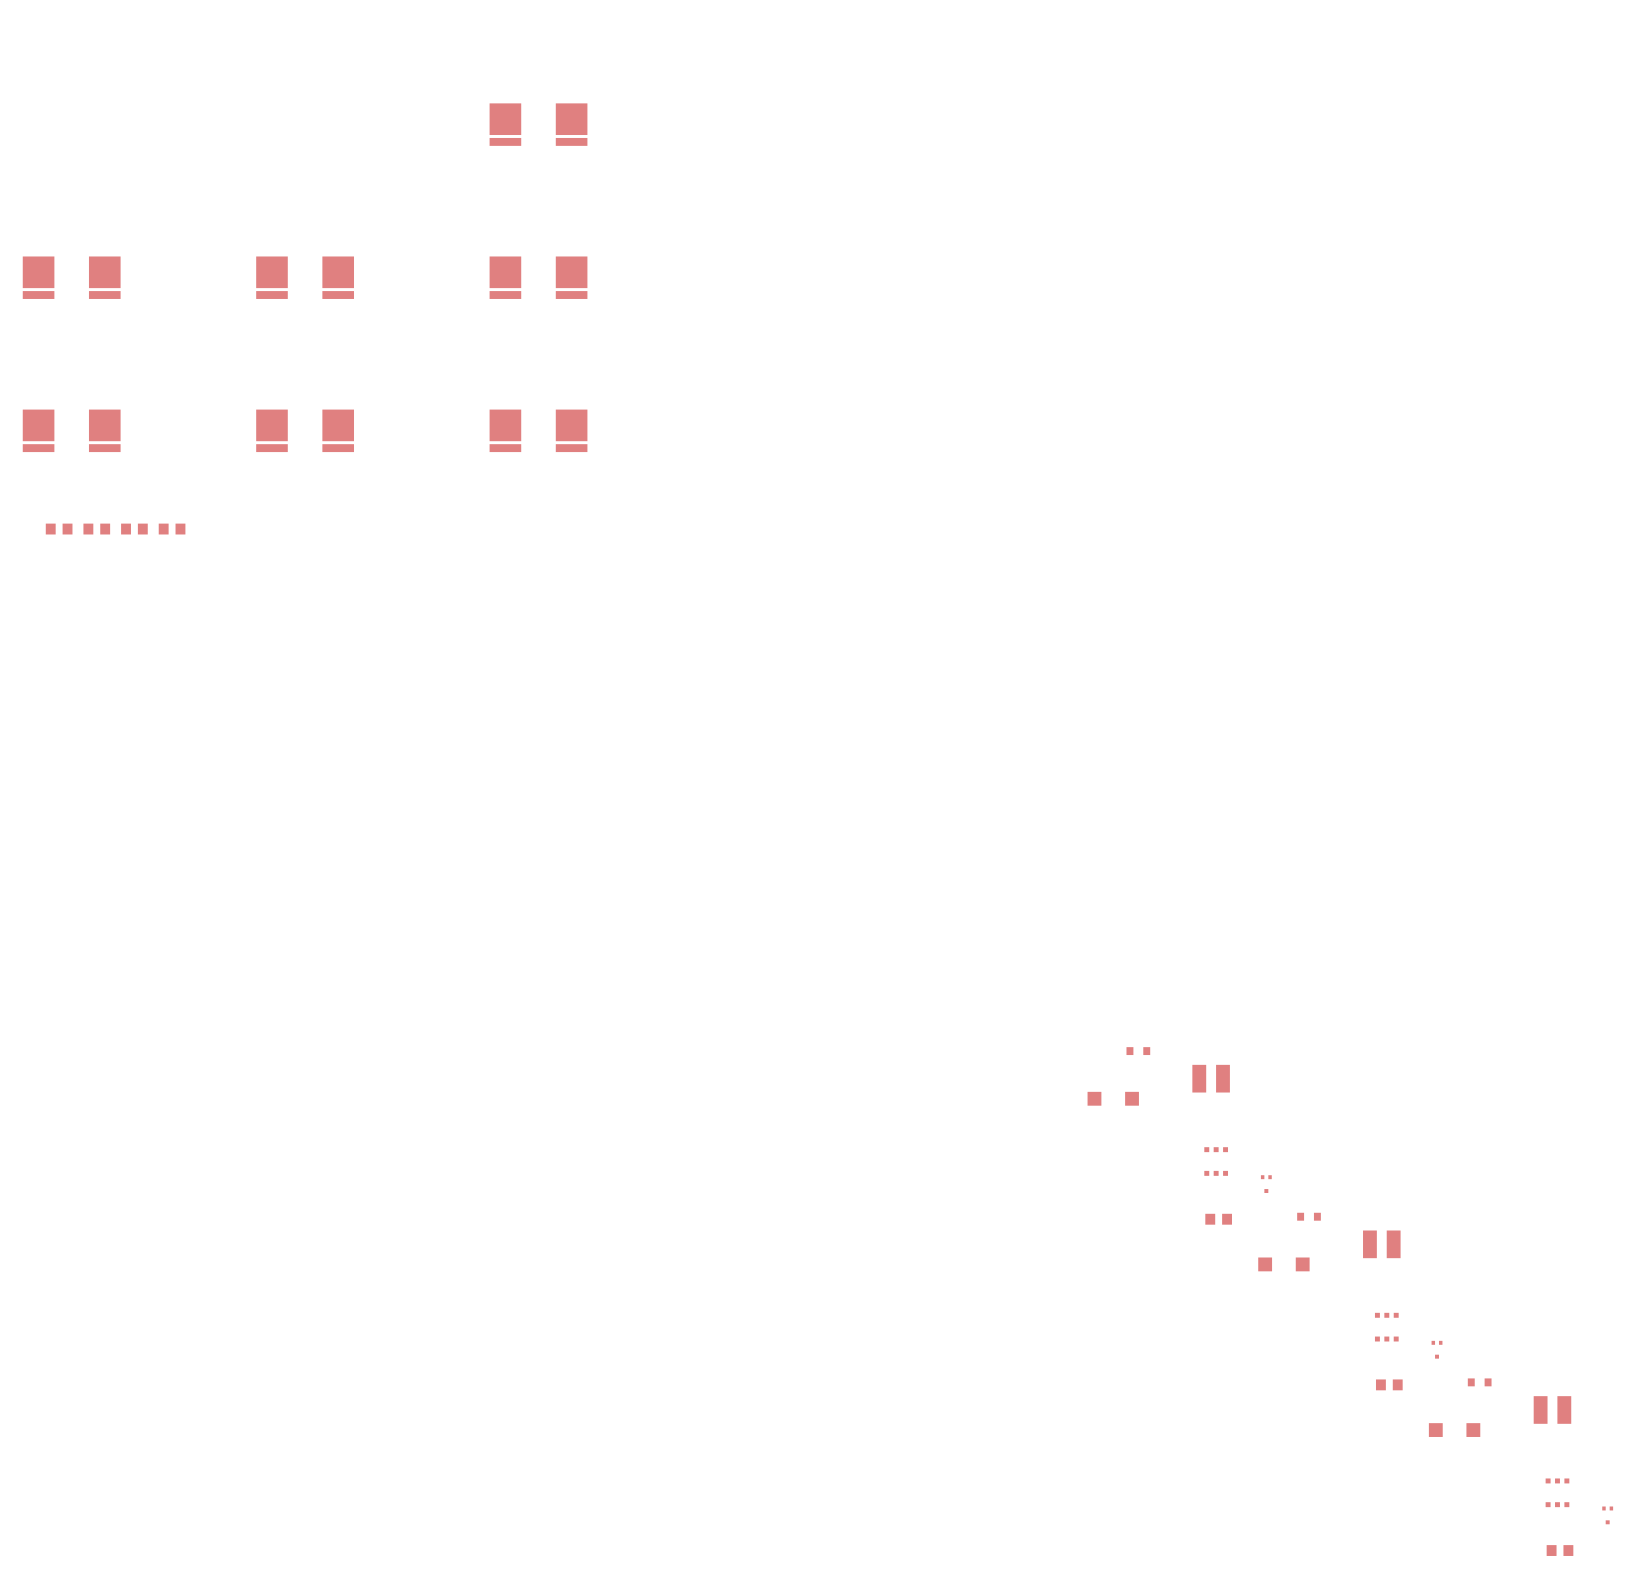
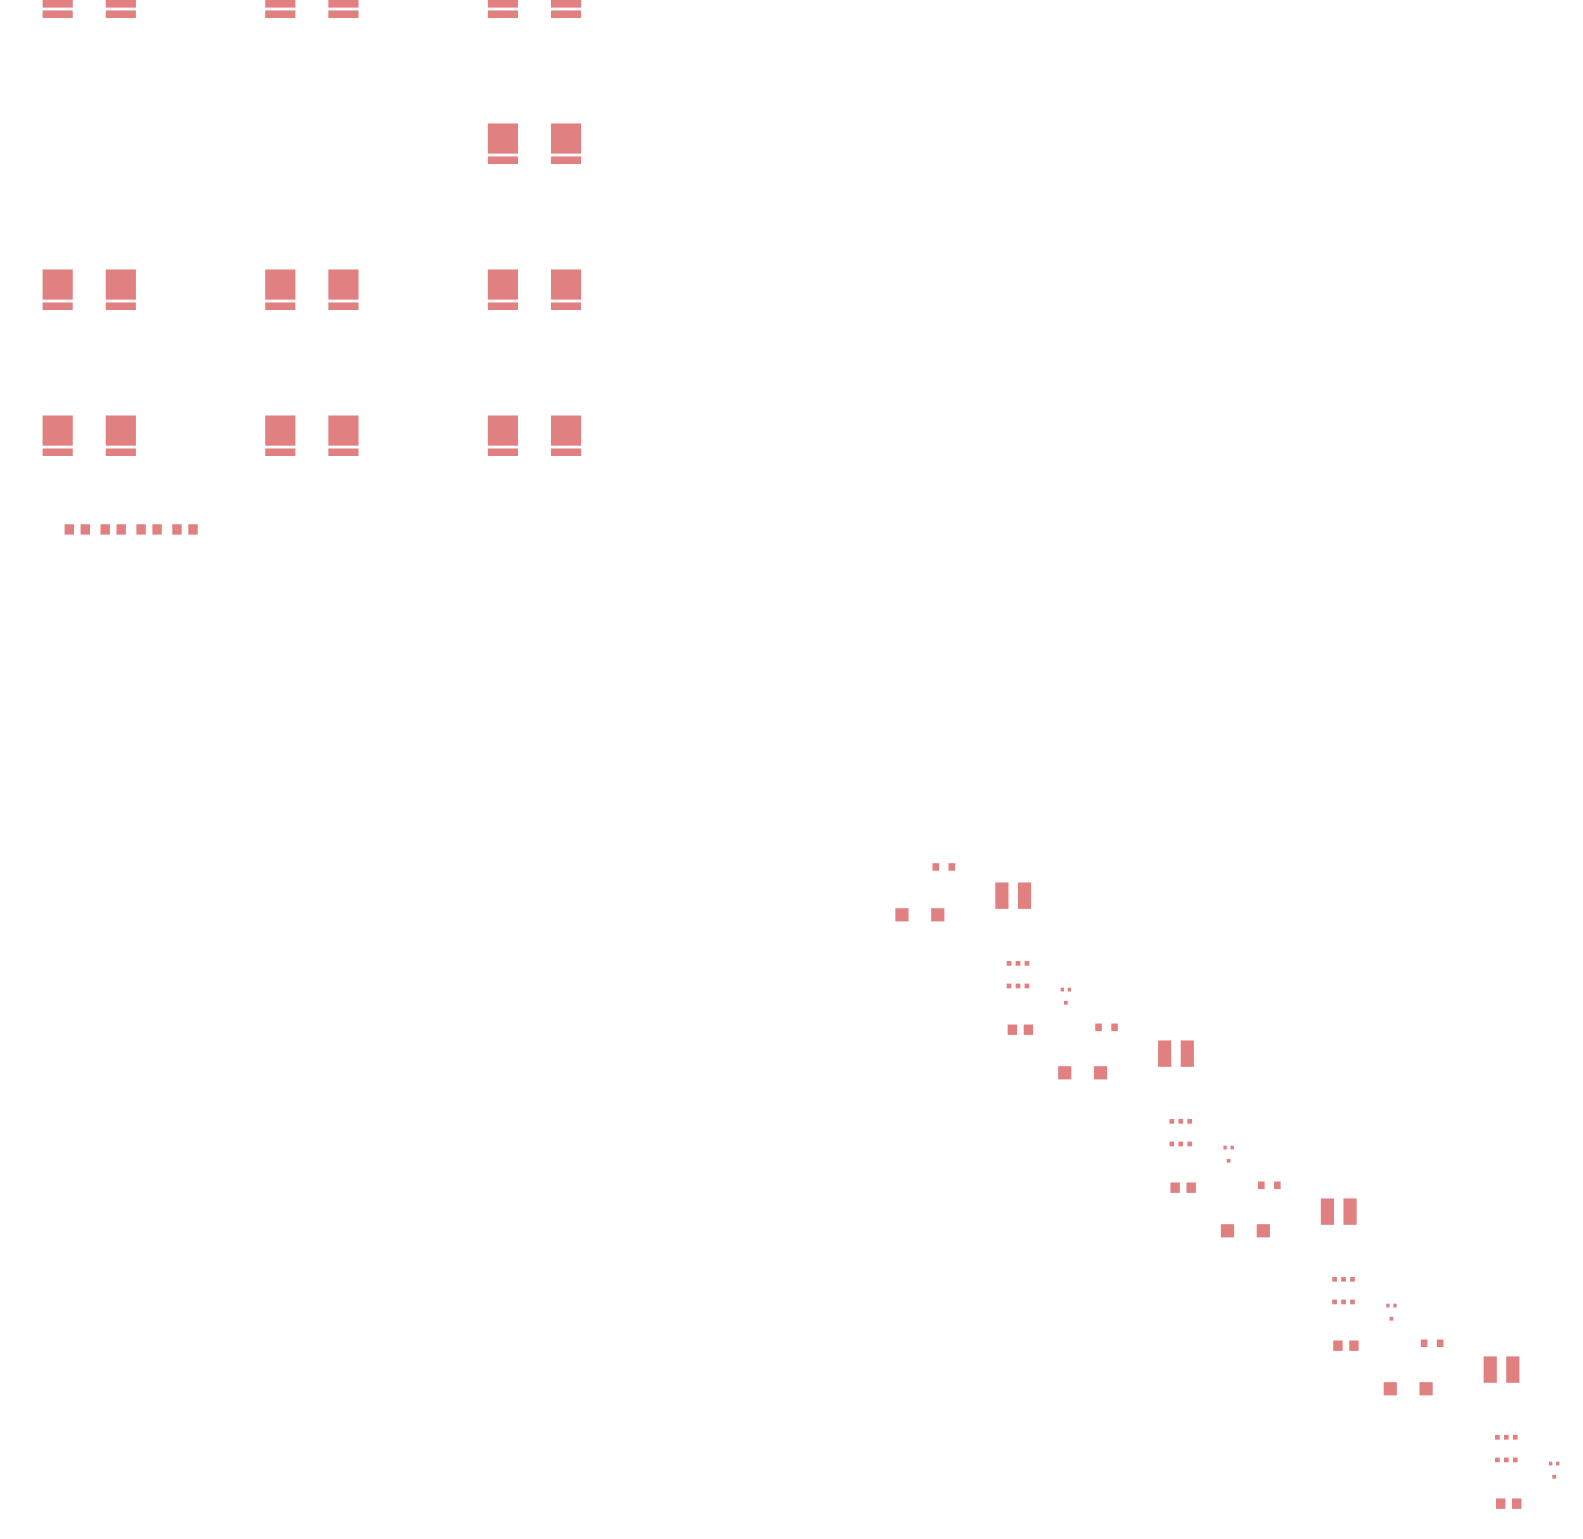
part: none -> (943, 866)
part: none -> (1013, 895)
part: none -> (919, 914)
part: none -> (1018, 974)
part: none -> (1065, 996)
part: none -> (1020, 1029)

